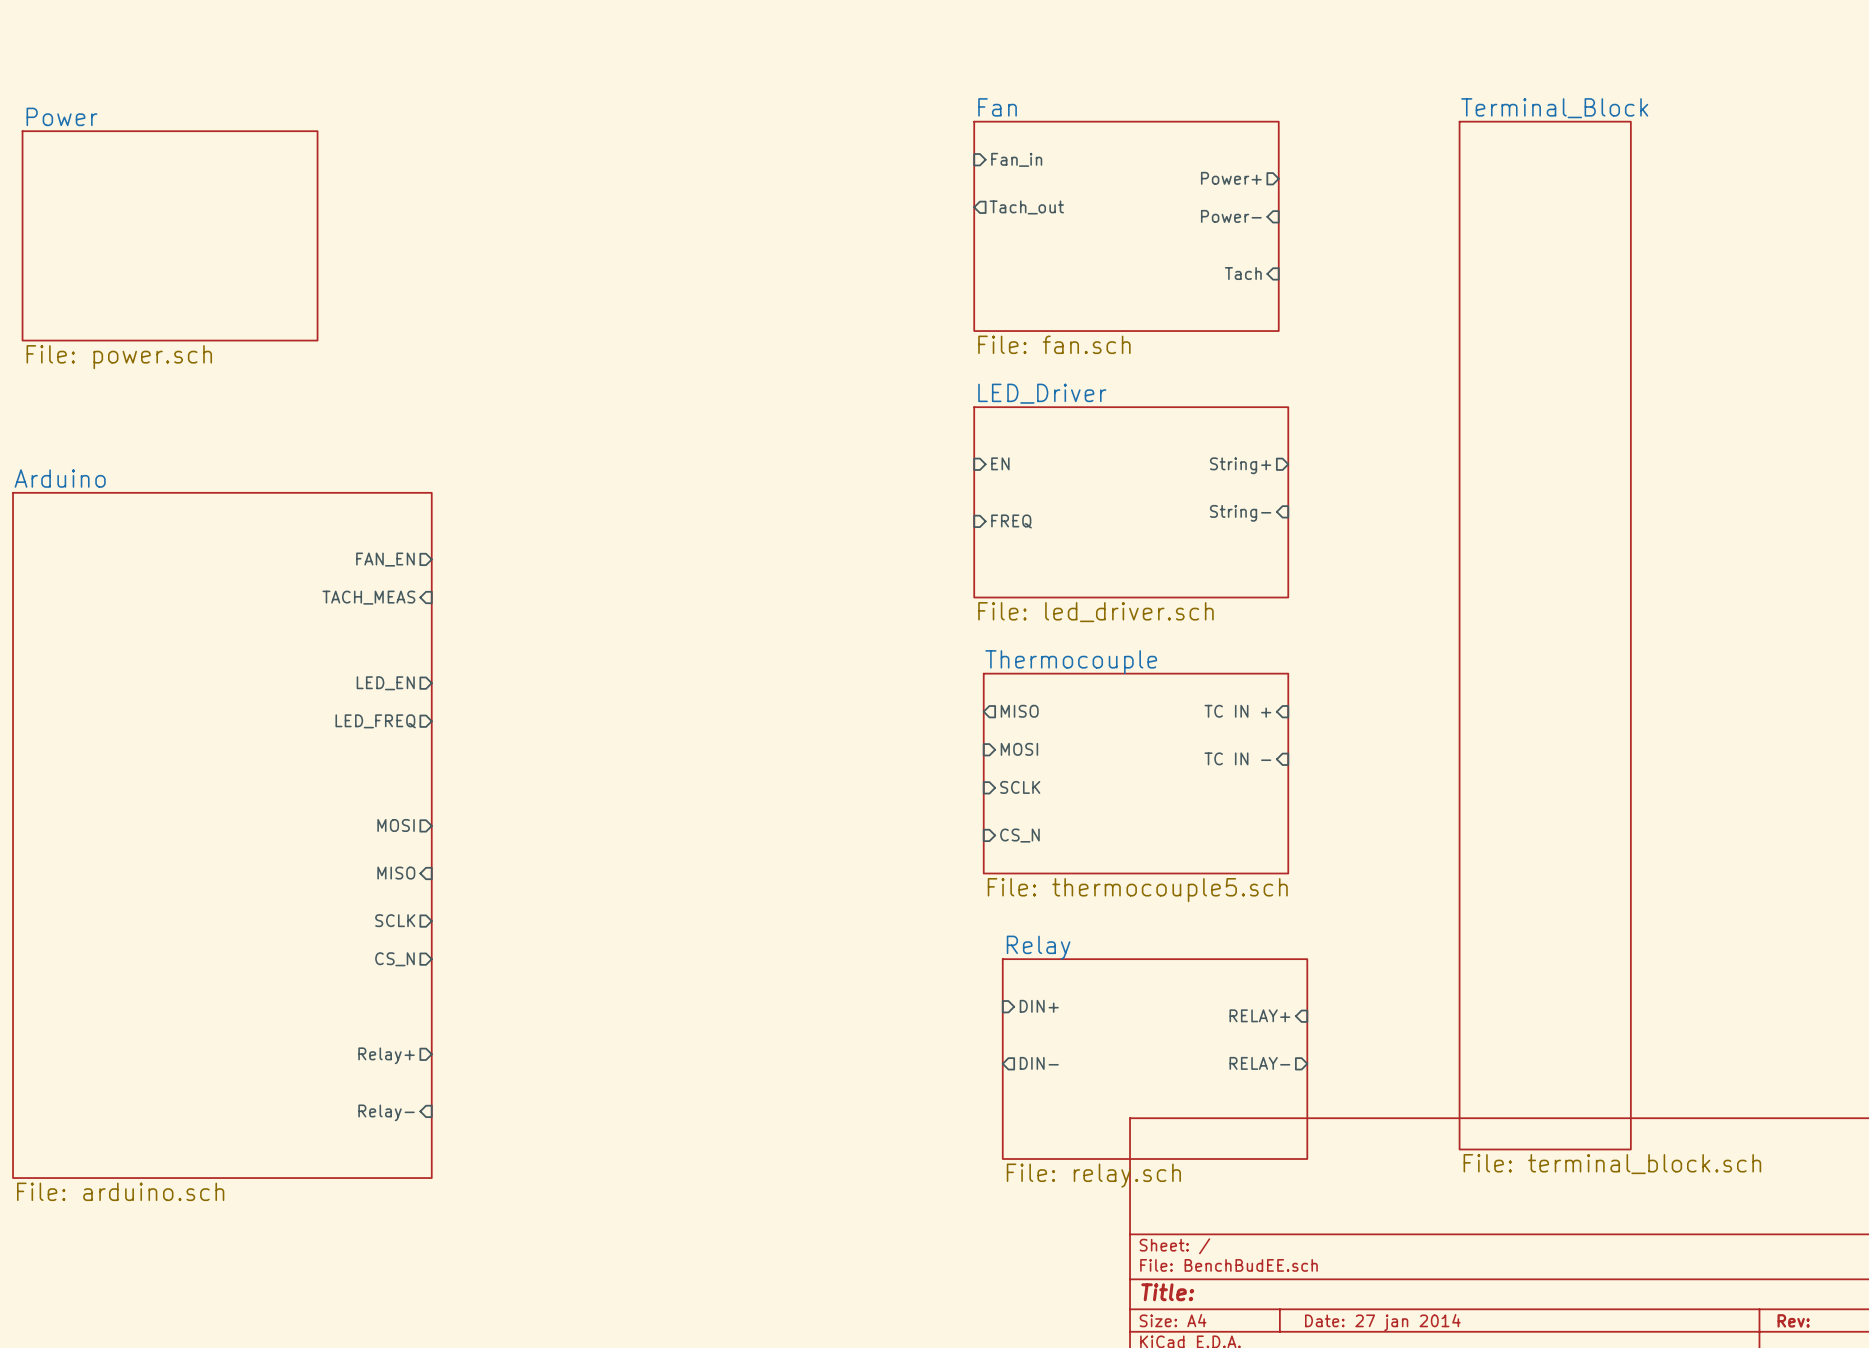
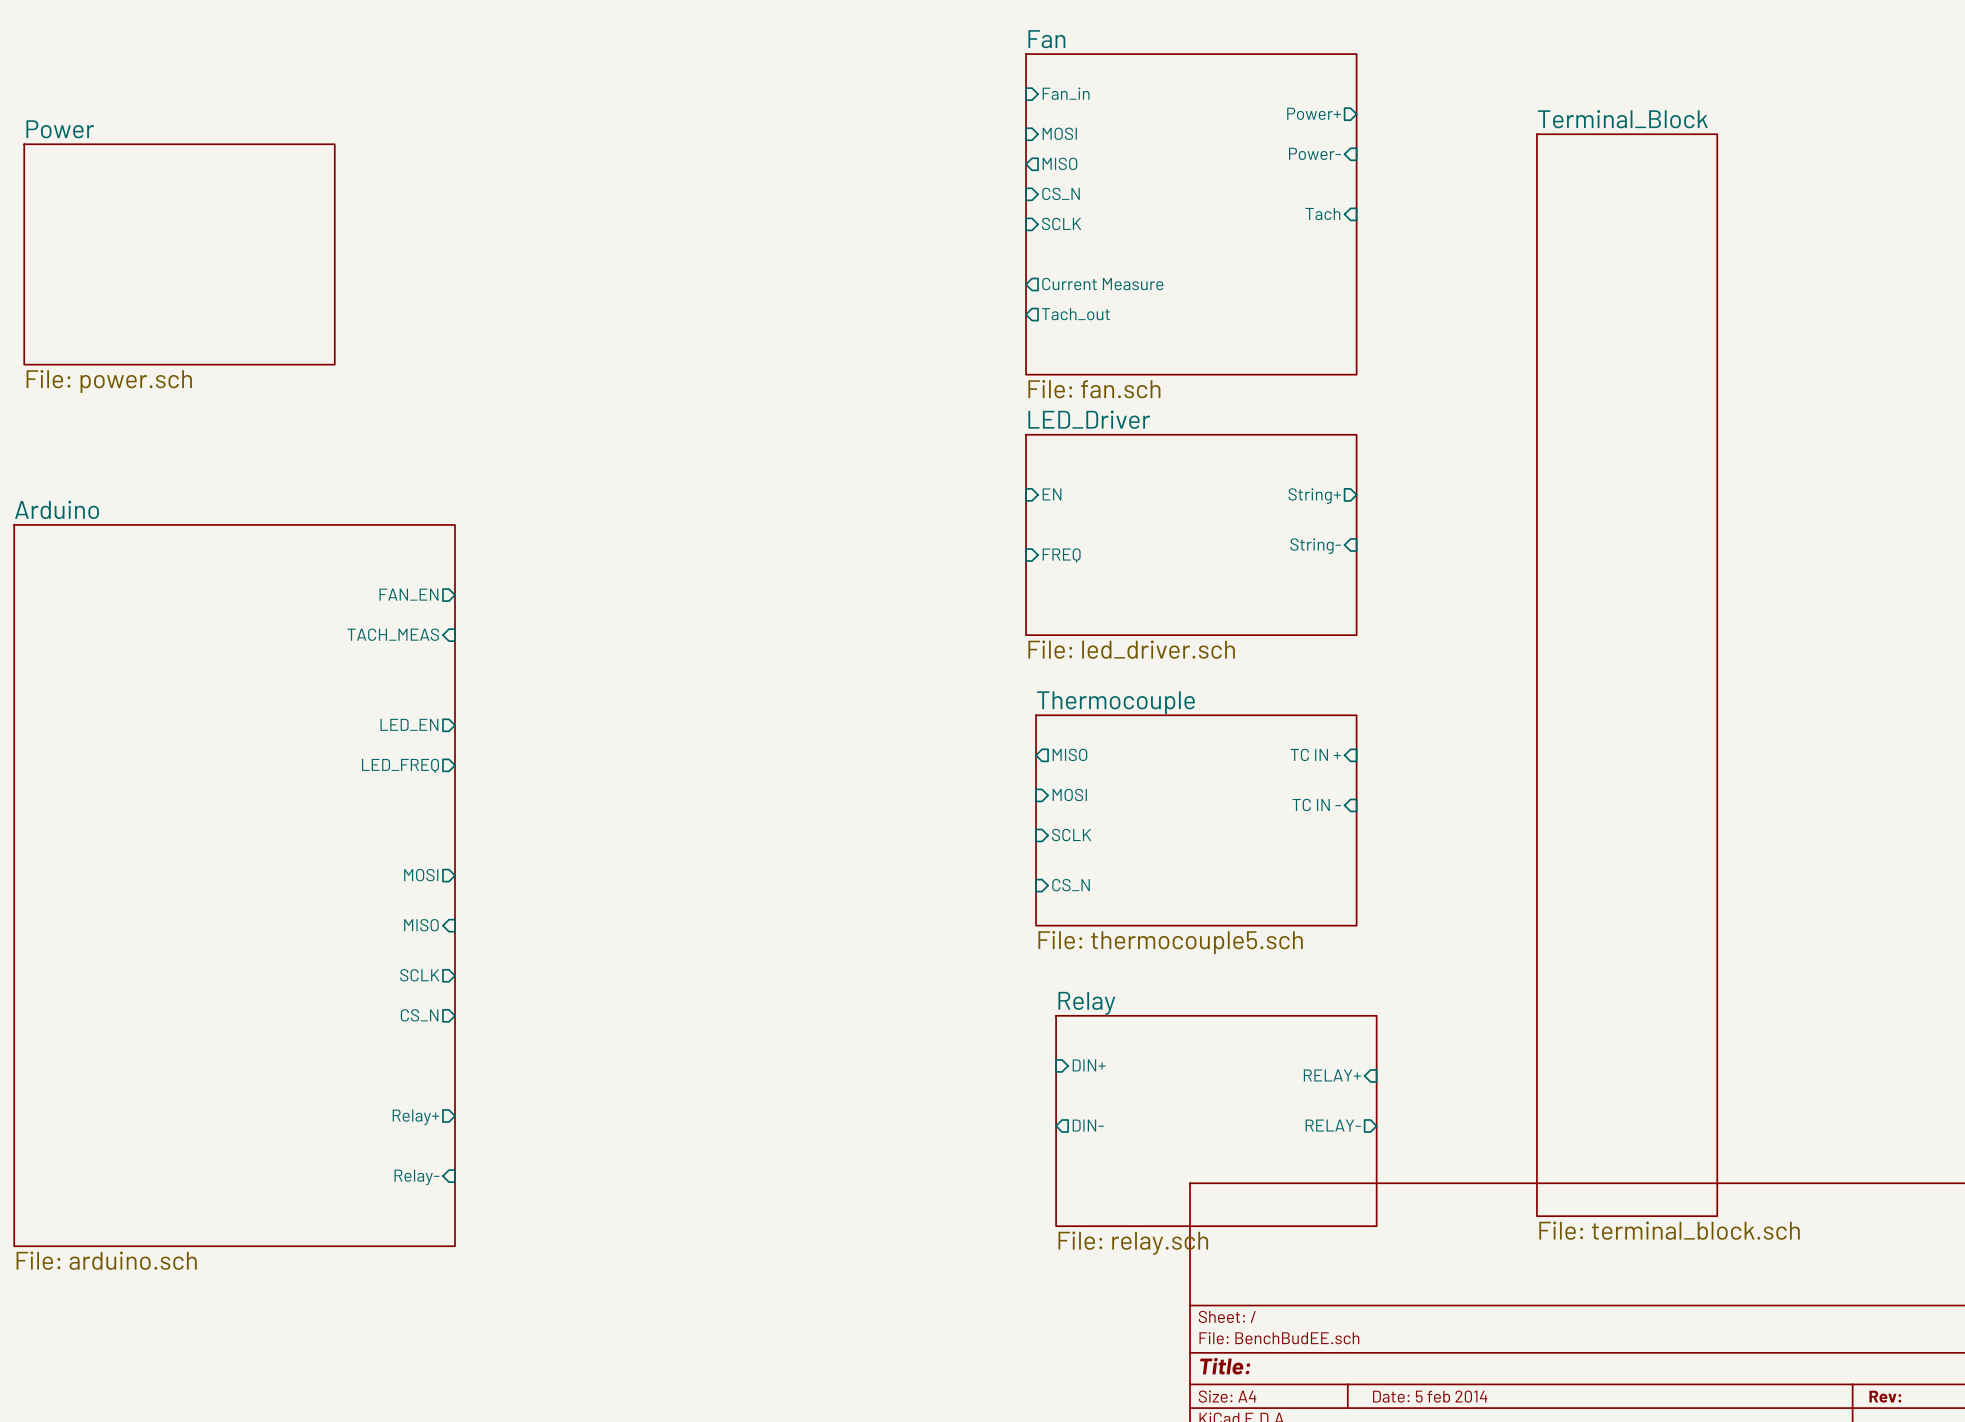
sheet pin: none -> MOSI (1059, 133)
sheet pin: none -> MISO (1059, 163)
sheet pin position: Fan_in (1016, 159) -> Fan_in (1066, 93)
sheet pin: none -> CS_N (1061, 193)
sheet pin position: Power+ (1231, 178) -> Power+ (1314, 113)
sheet Fan: none -> File: fan.sch (1191, 214)
sheet pin shape: output (1026, 207) -> input (1061, 223)
sheet pin: Tach_out (1026, 207) -> SCLK (1061, 223)
sheet pin position: Power- (1231, 216) -> Power- (1314, 153)
sheet Fan: File: fan.sch (1126, 226) -> none
sheet pin: none -> Current Measure (1102, 284)
sheet pin position: Tach (1243, 273) -> Tach (1322, 214)
sheet pin: none -> Tach_out (1075, 314)
title block: Date: 27 jan 2014 (1382, 1322) -> Date: 5 feb 2014 (1430, 1396)

